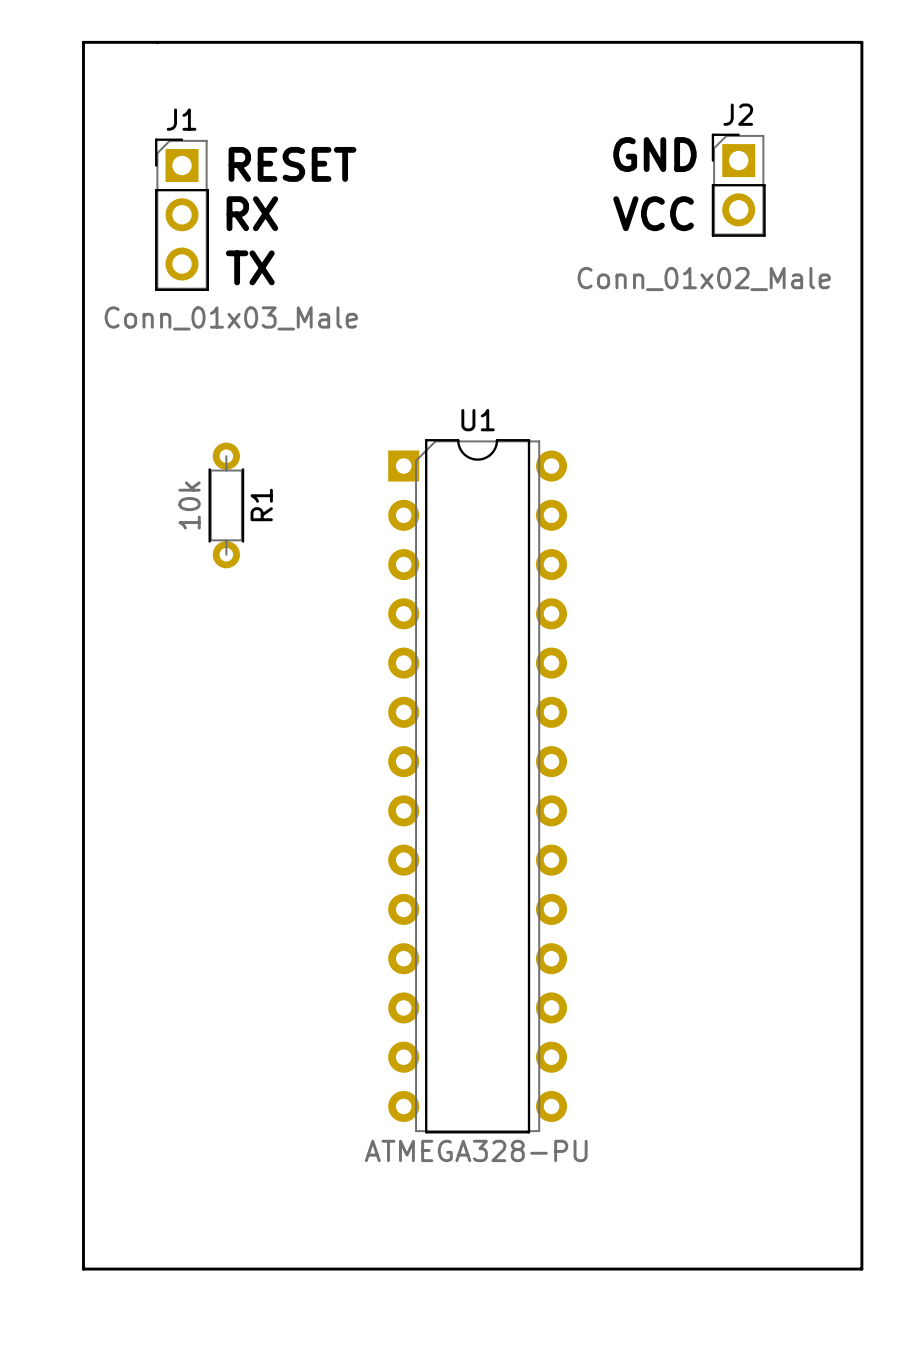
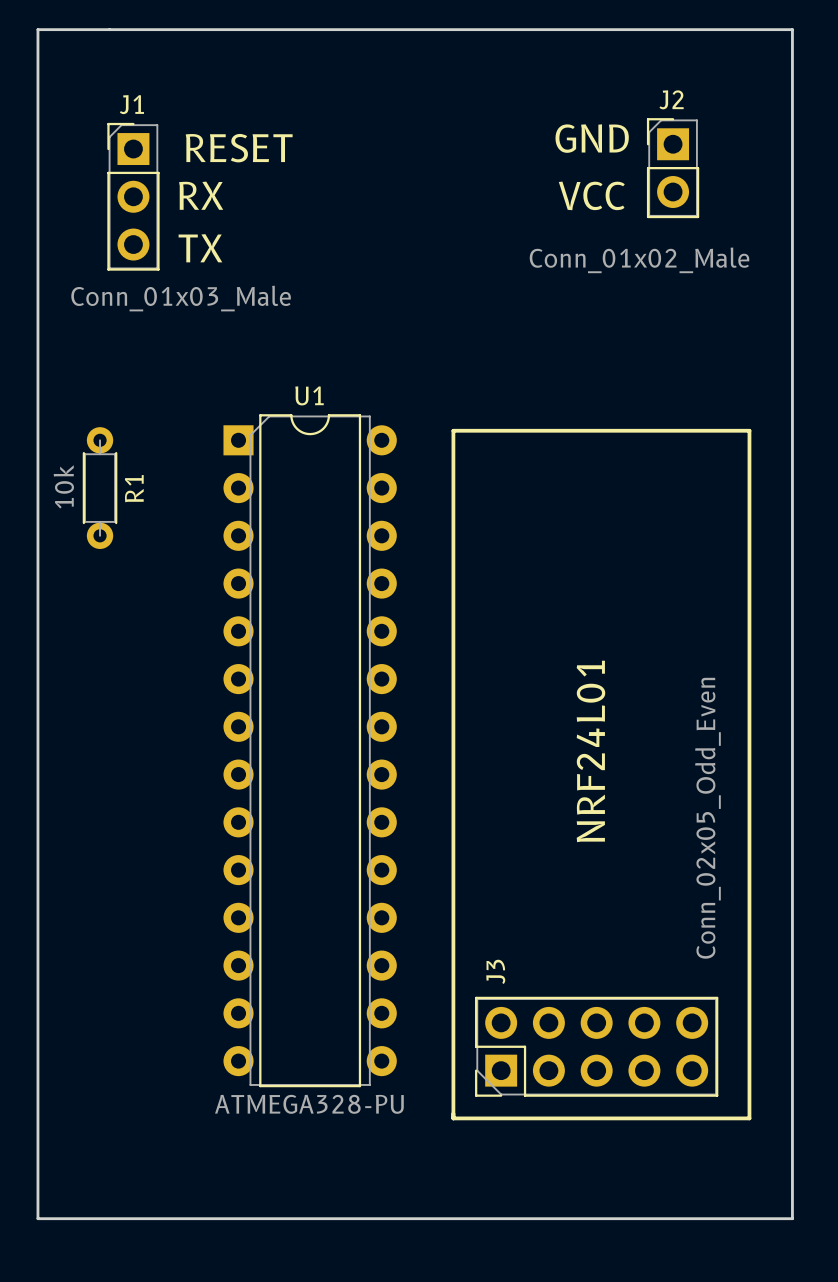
line: none -> (453, 430) (453, 1118) (749, 1118) (749, 430) (453, 430)
R1 position: (226, 505) -> (100, 488)
text: none -> NRF24L01 (590, 751)
U1 position: (477, 786) -> (310, 750)
J3: none -> Conn_02x05_Odd_Even (596, 1046)

